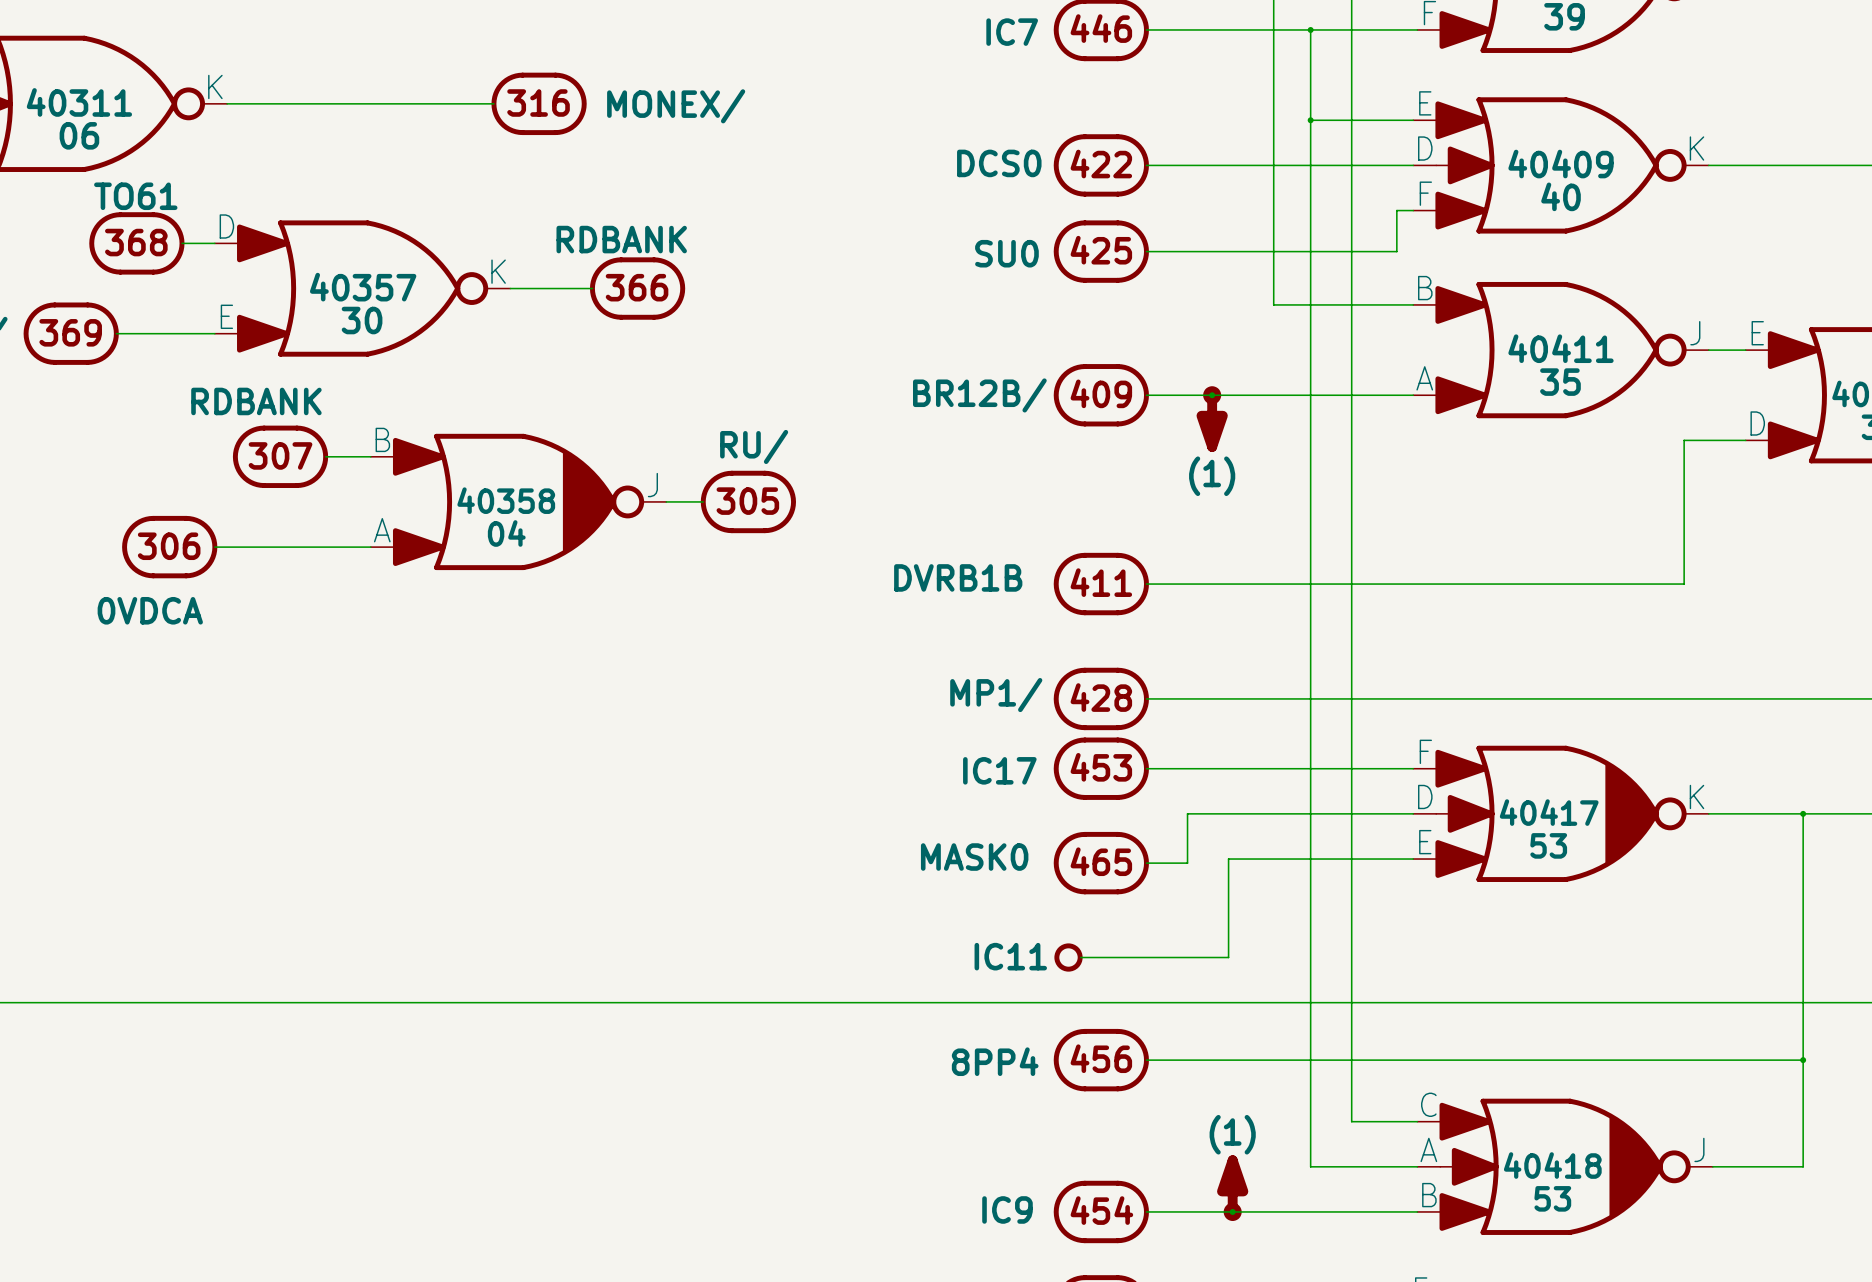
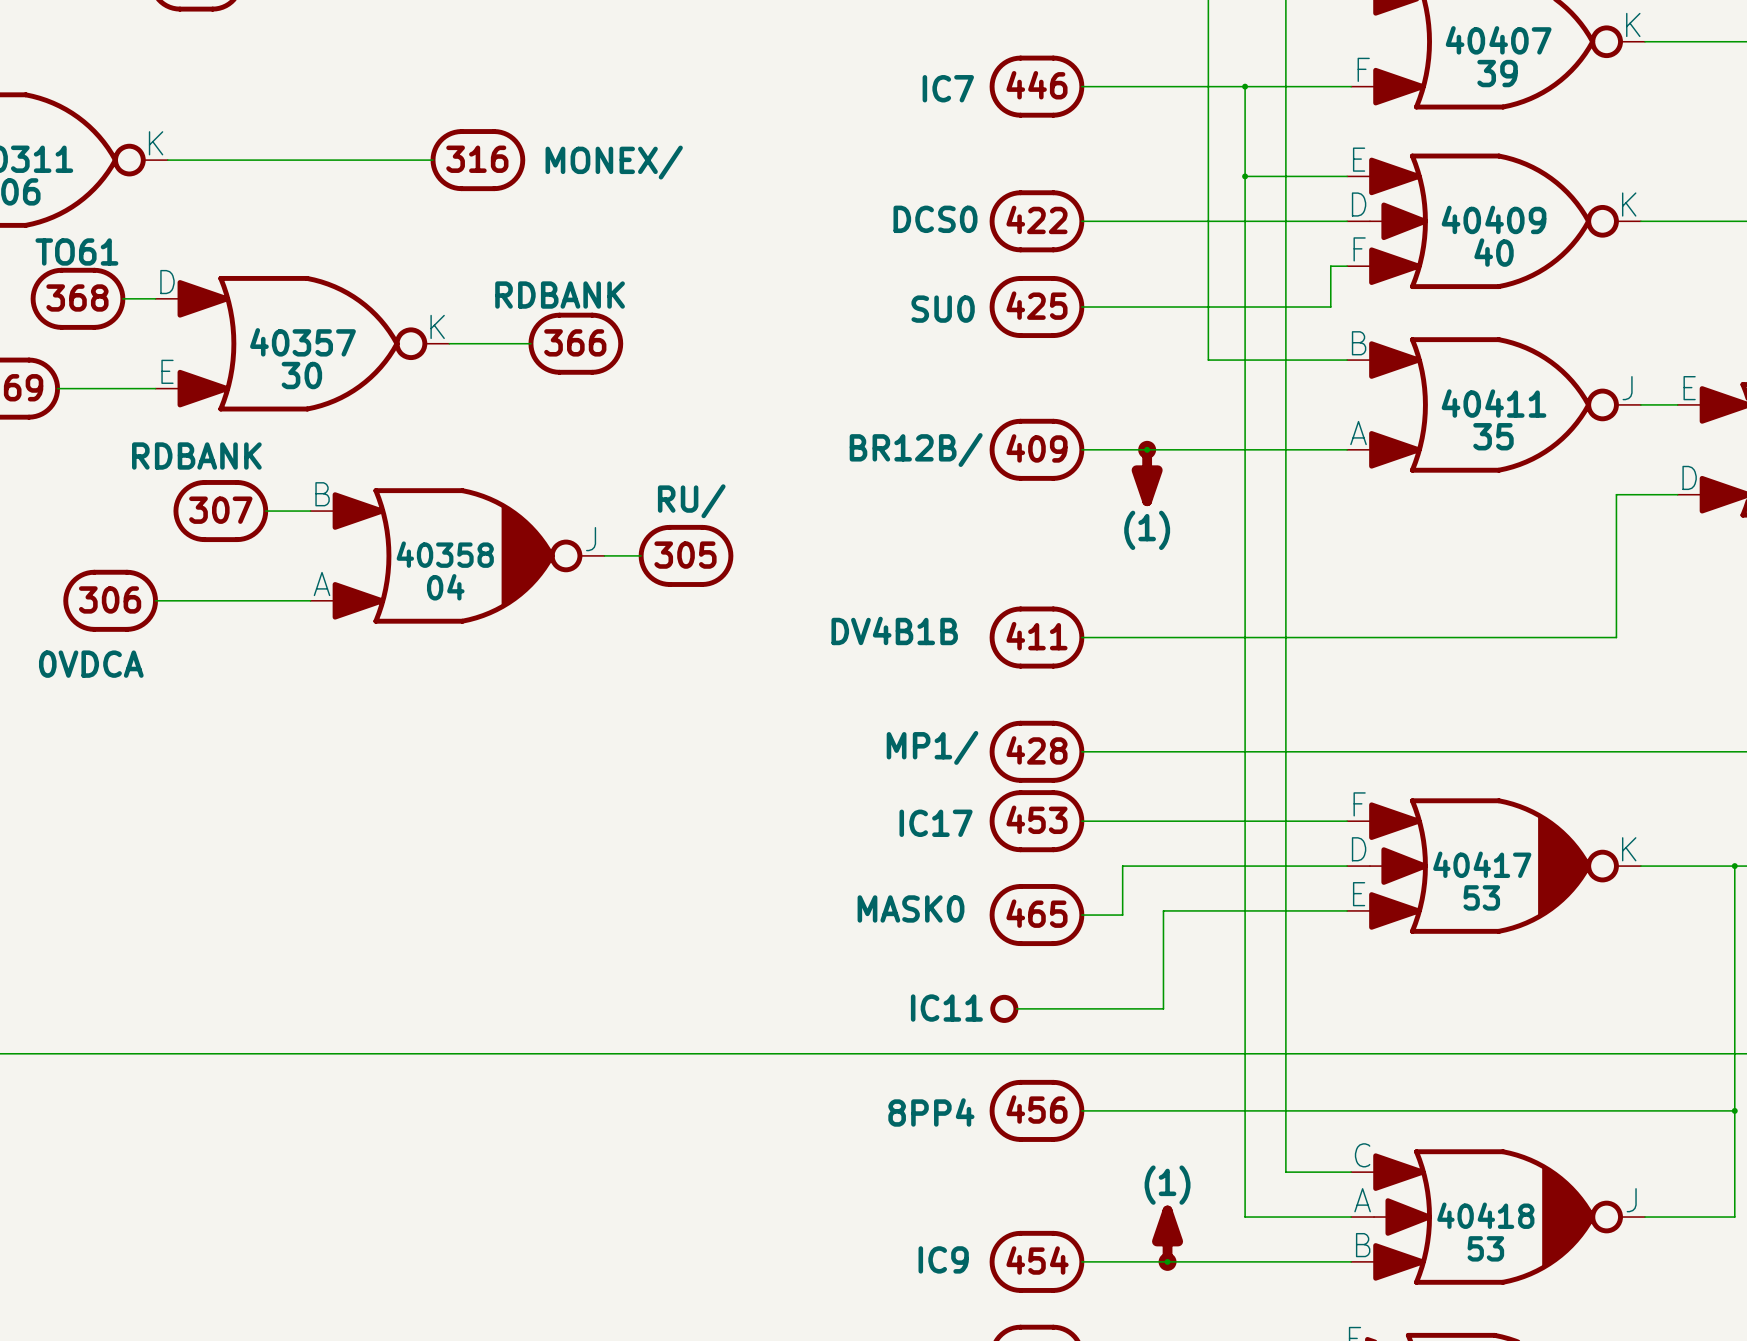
part text: DVRB1B (958, 577) -> DV4B1B (894, 630)

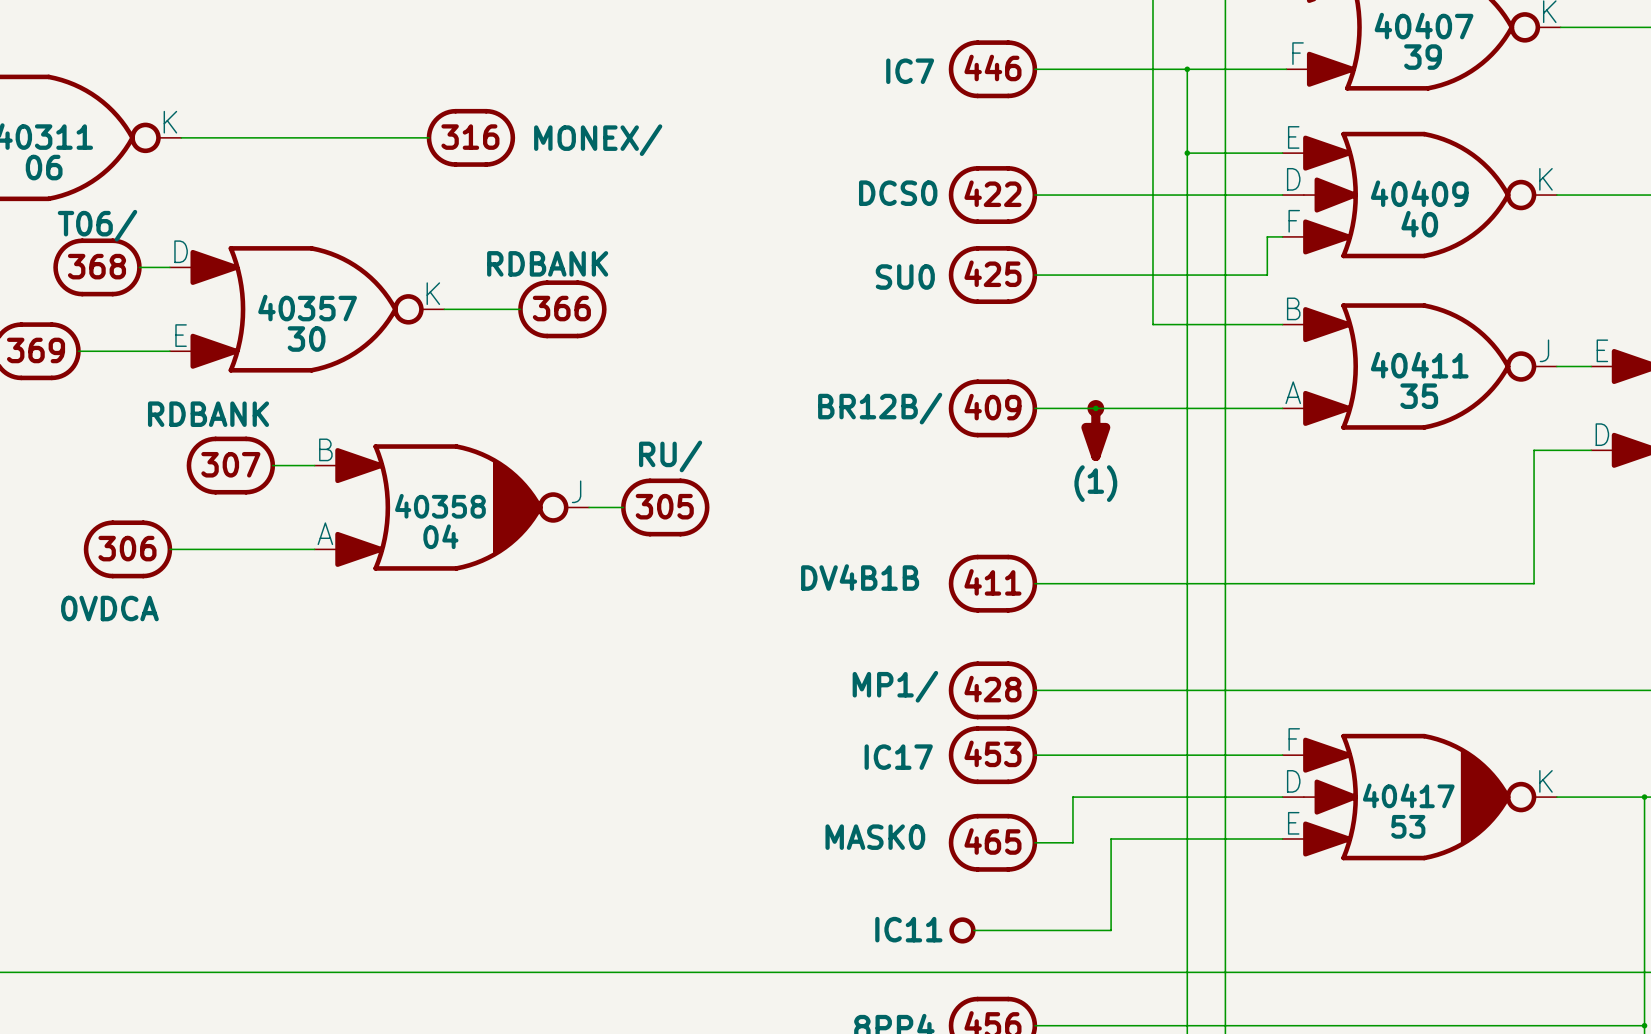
part text: TO61 (76, 251) -> T06/ (97, 225)

